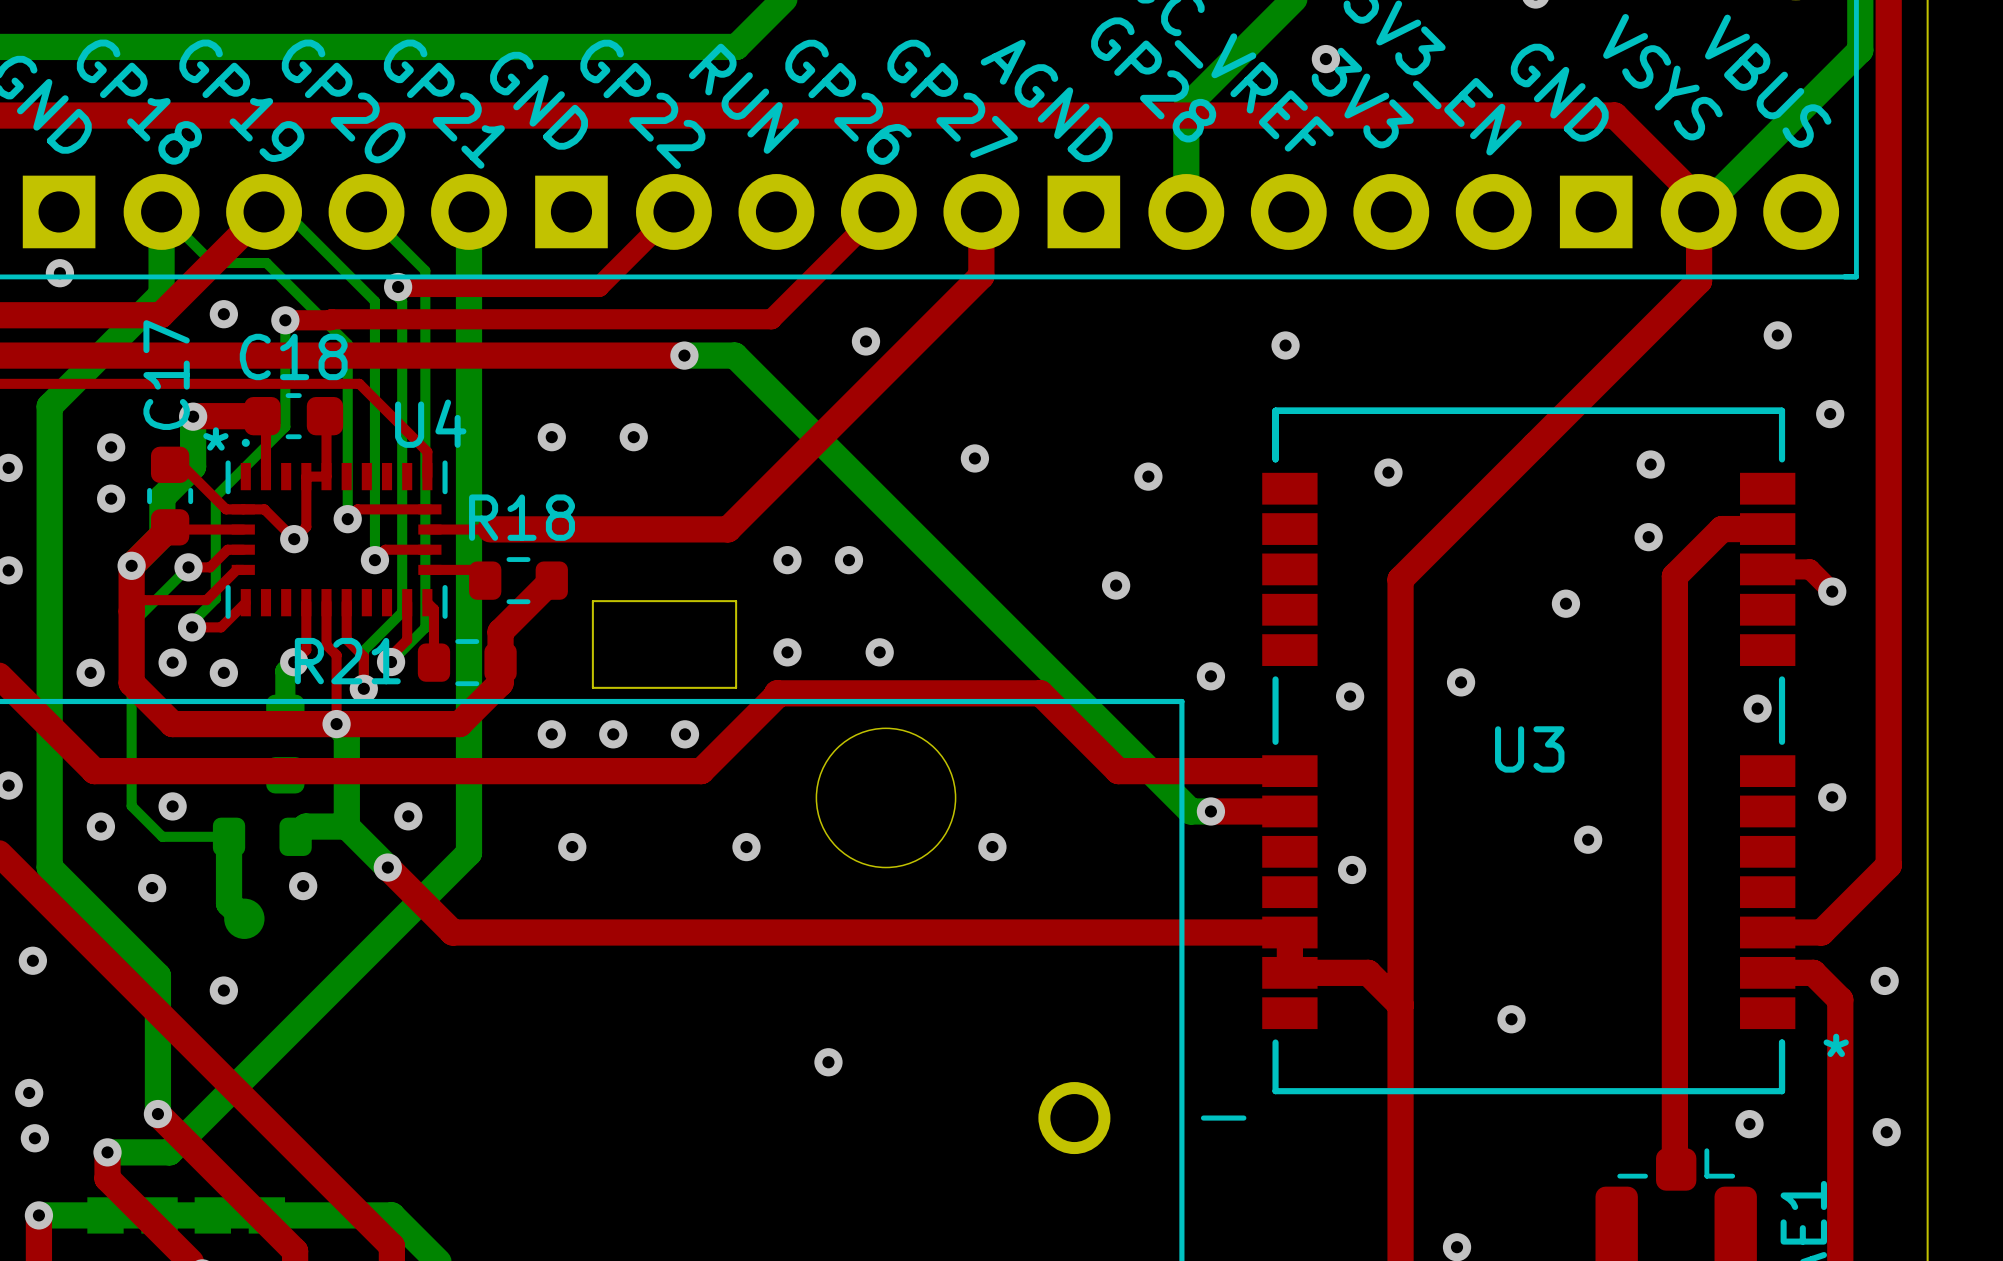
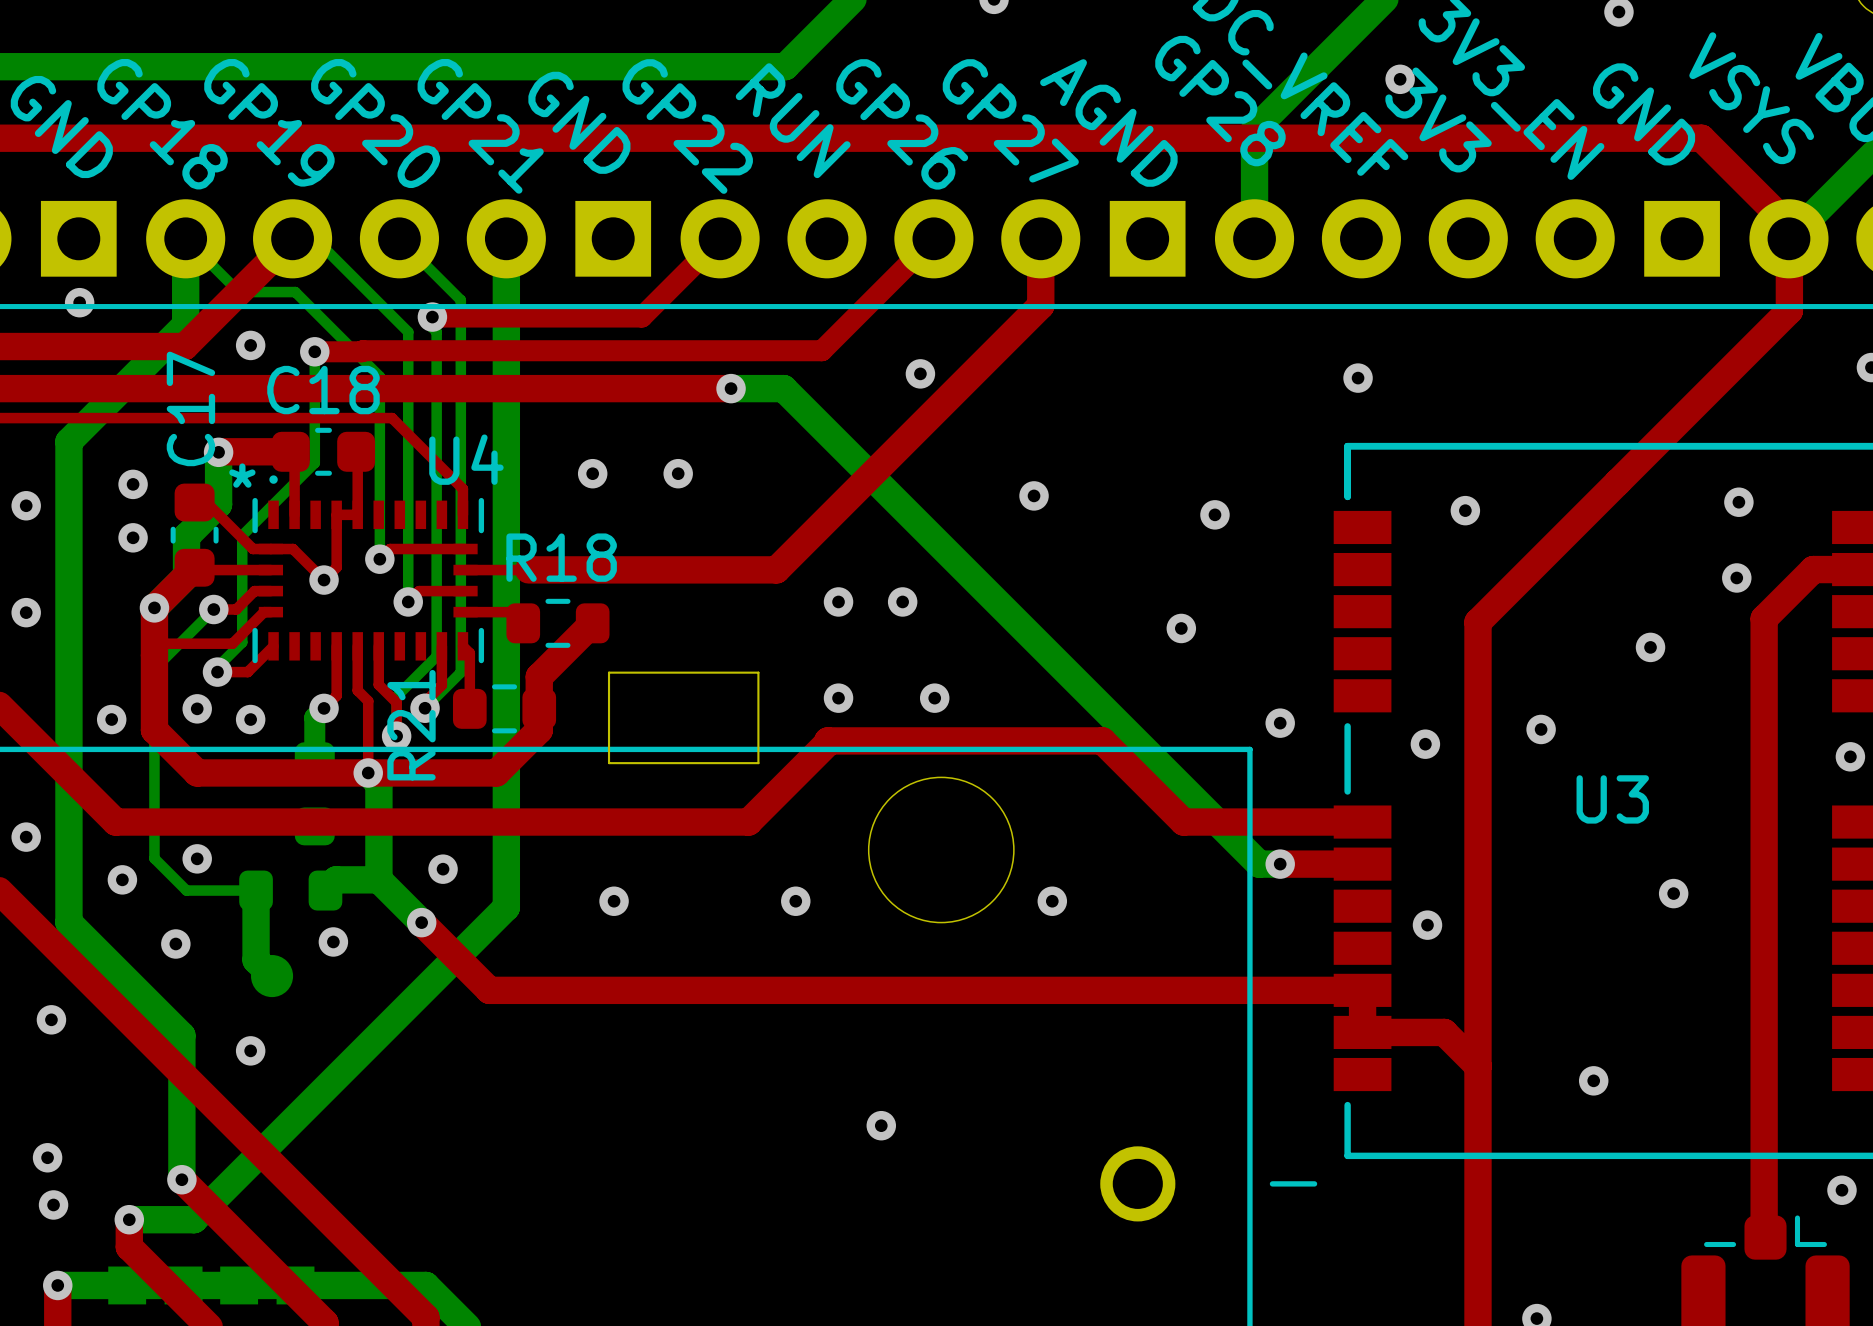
board edge: (592, 601) (736, 601) (736, 687) (592, 687) (592, 601) -> (609, 672) (758, 672) (758, 763) (609, 763) (609, 672)
R21 name rotation: 0° (347, 661) -> 90° counterclockwise (411, 725)
via: (551, 734) -> none
via: (613, 734) -> none
via: (685, 734) -> none

